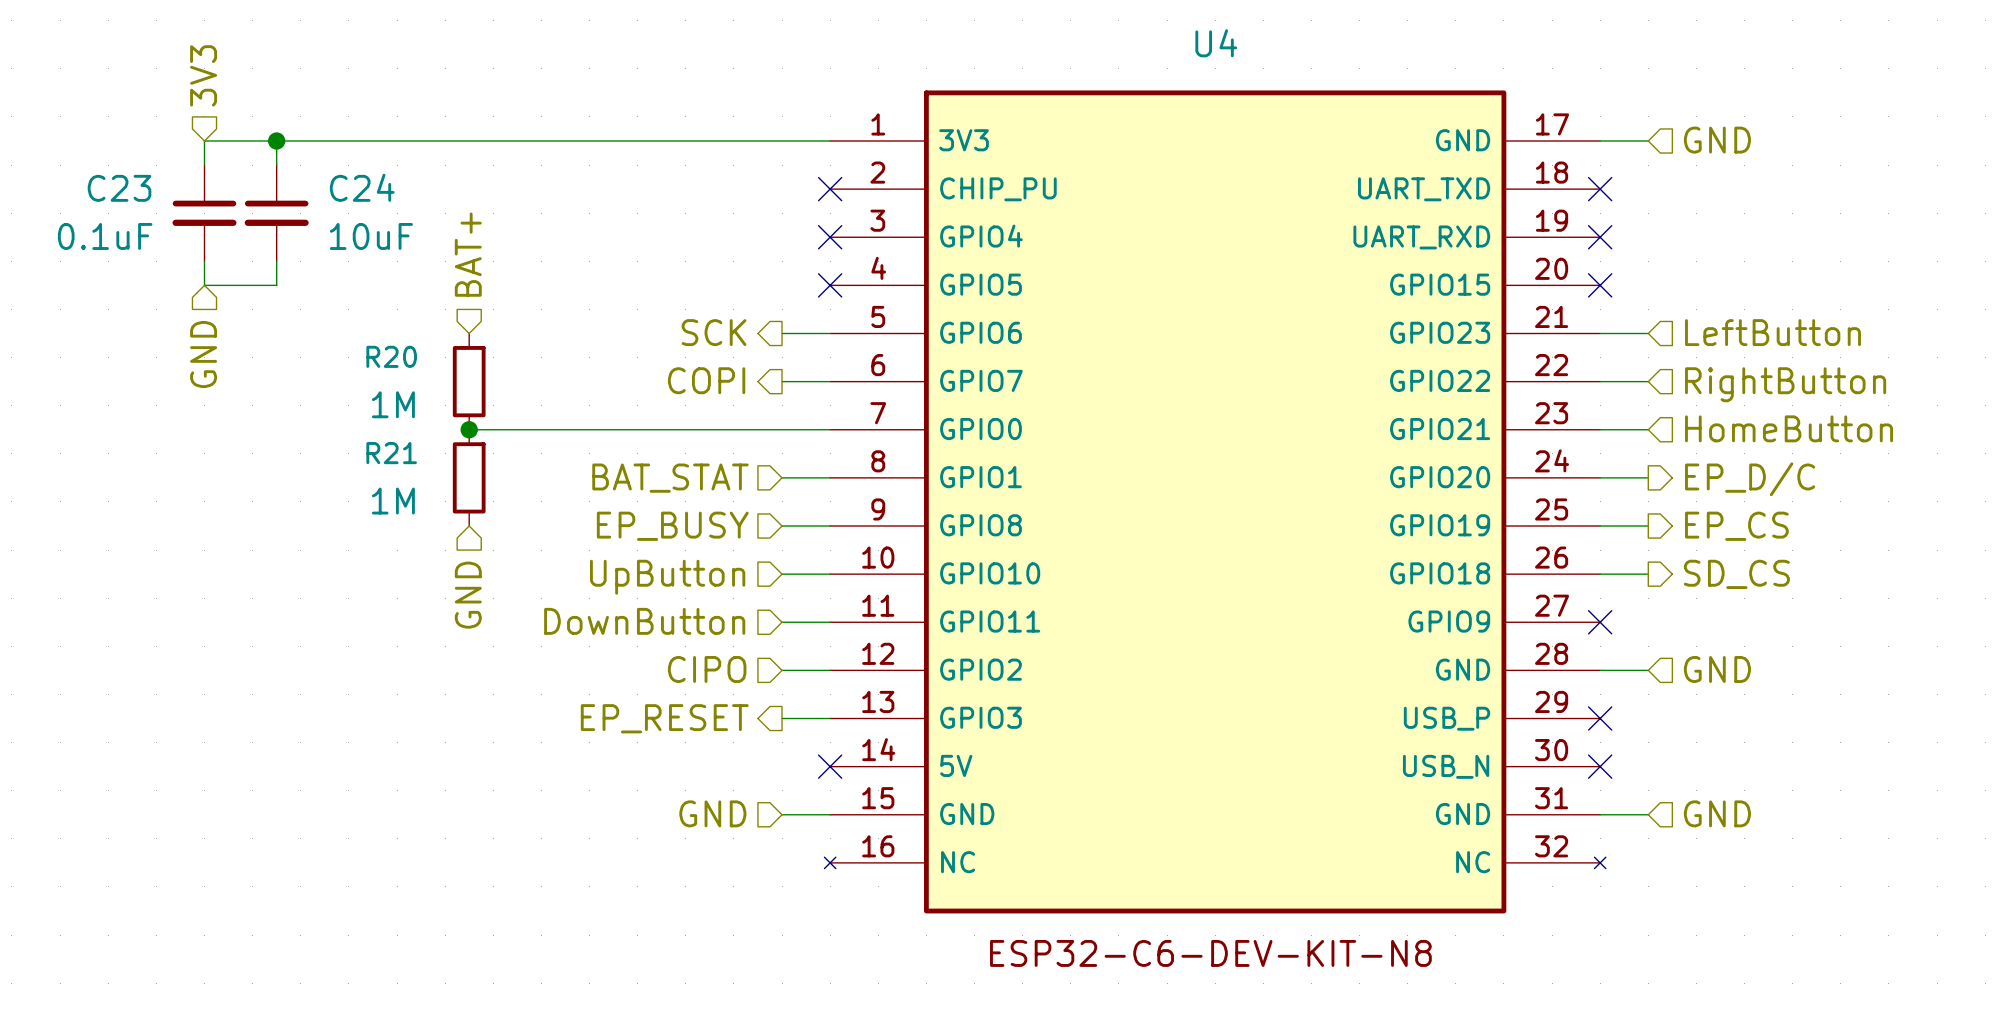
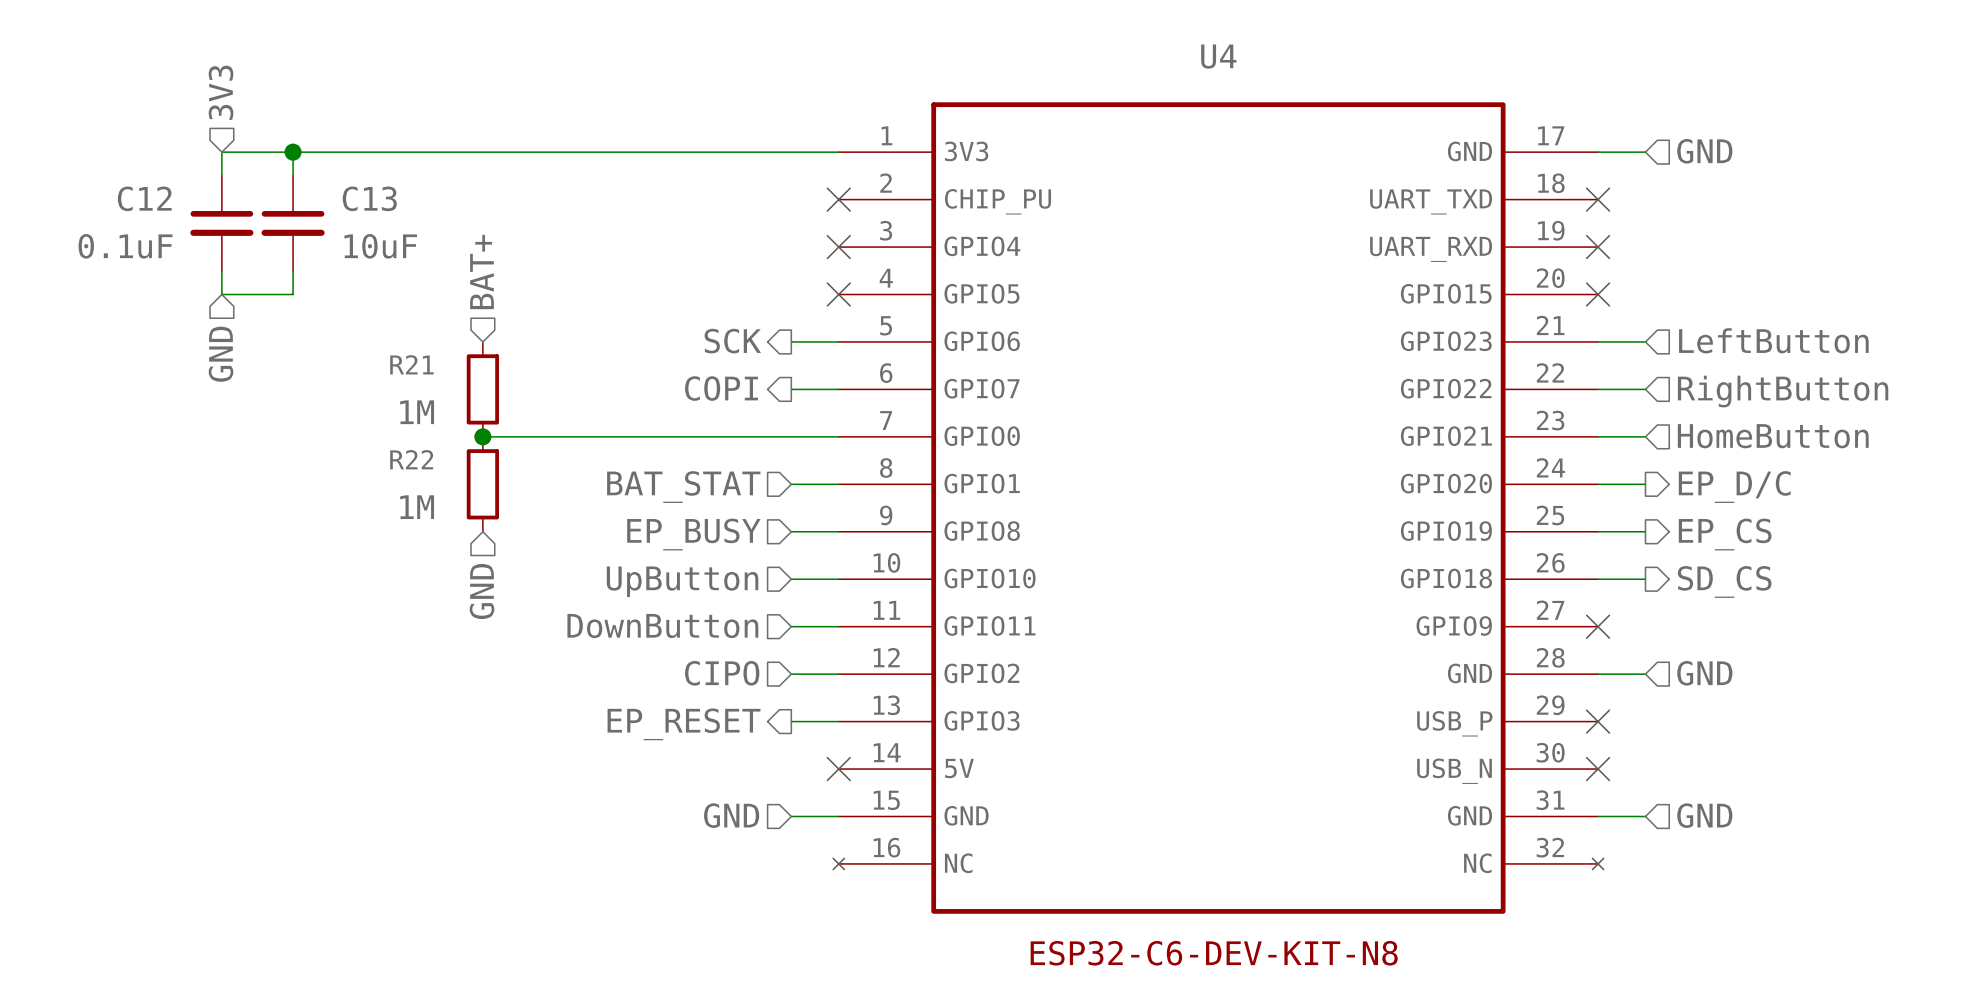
C24 name: C24 (362, 187) -> C13 (369, 198)
C23 name: C23 (119, 188) -> C12 (144, 198)
R20 name: R20 (391, 356) -> R21 (411, 364)
R21 name: R21 (391, 453) -> R22 (411, 459)

